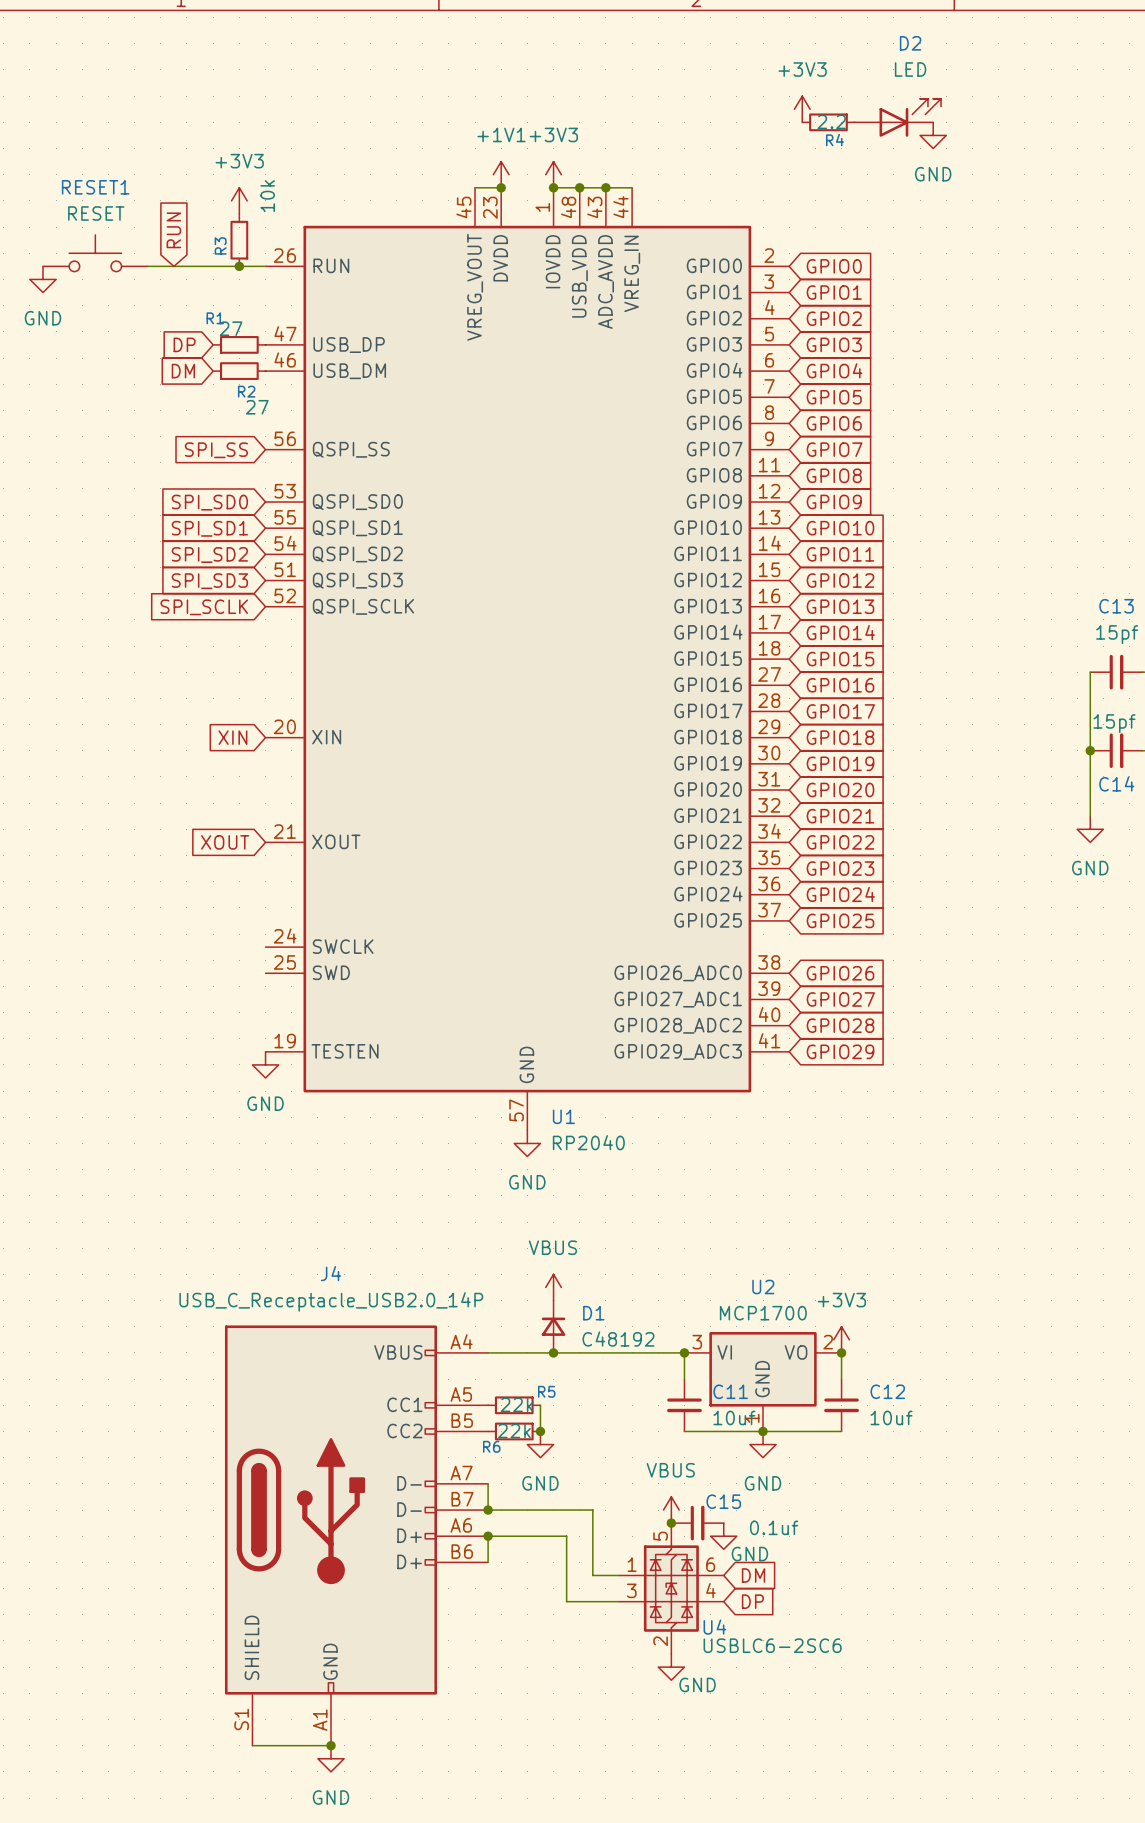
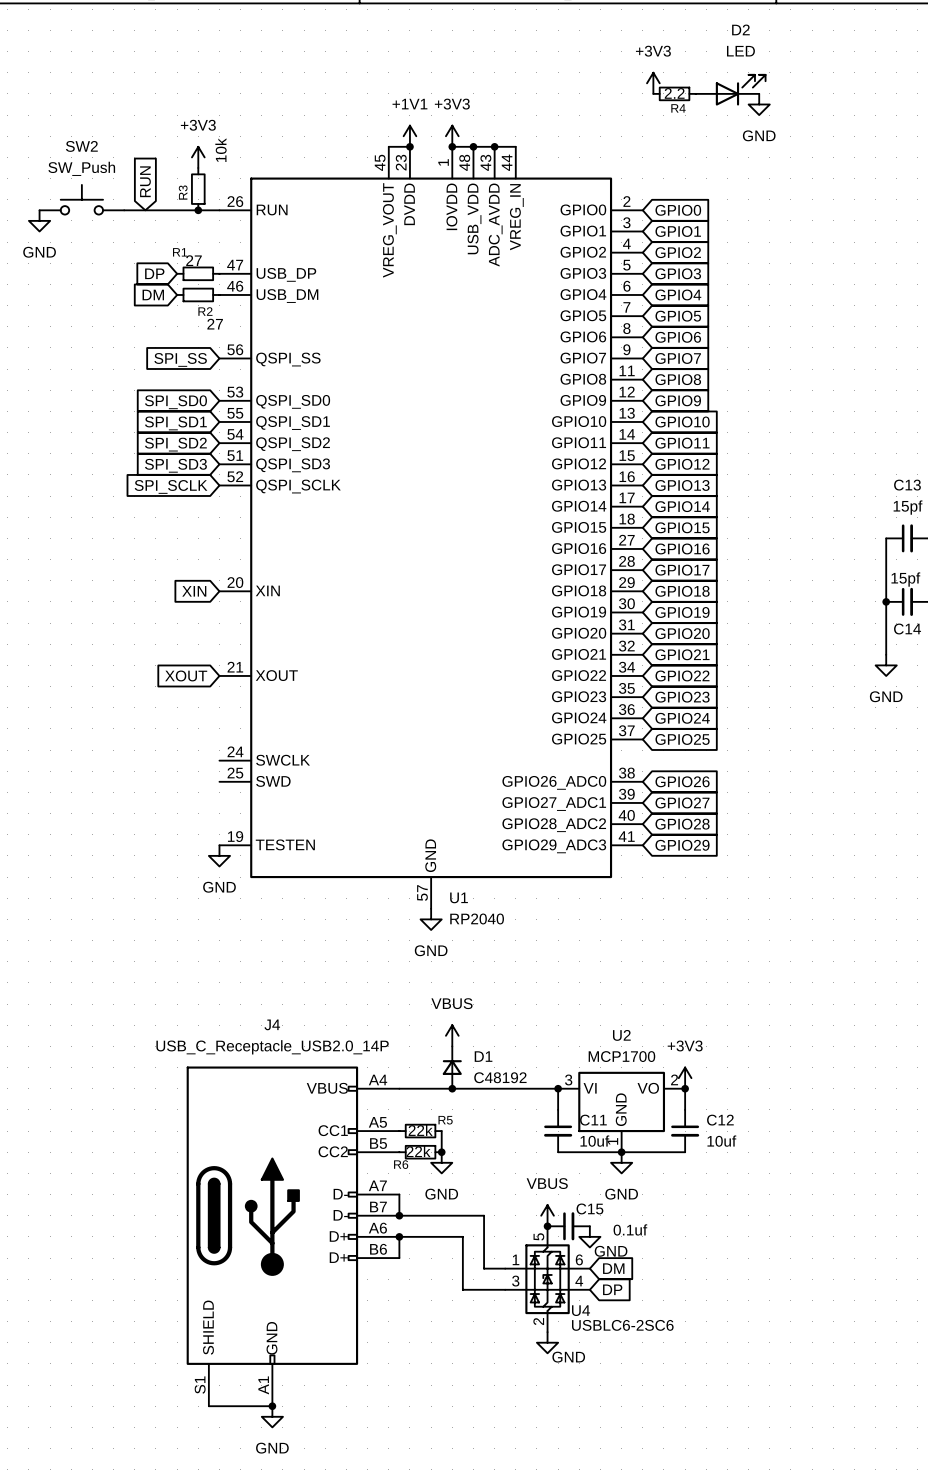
RESET1 name: RESET1 (95, 187) -> SW2 (81, 146)
RESET1 value: RESET (96, 213) -> SW_Push (81, 168)

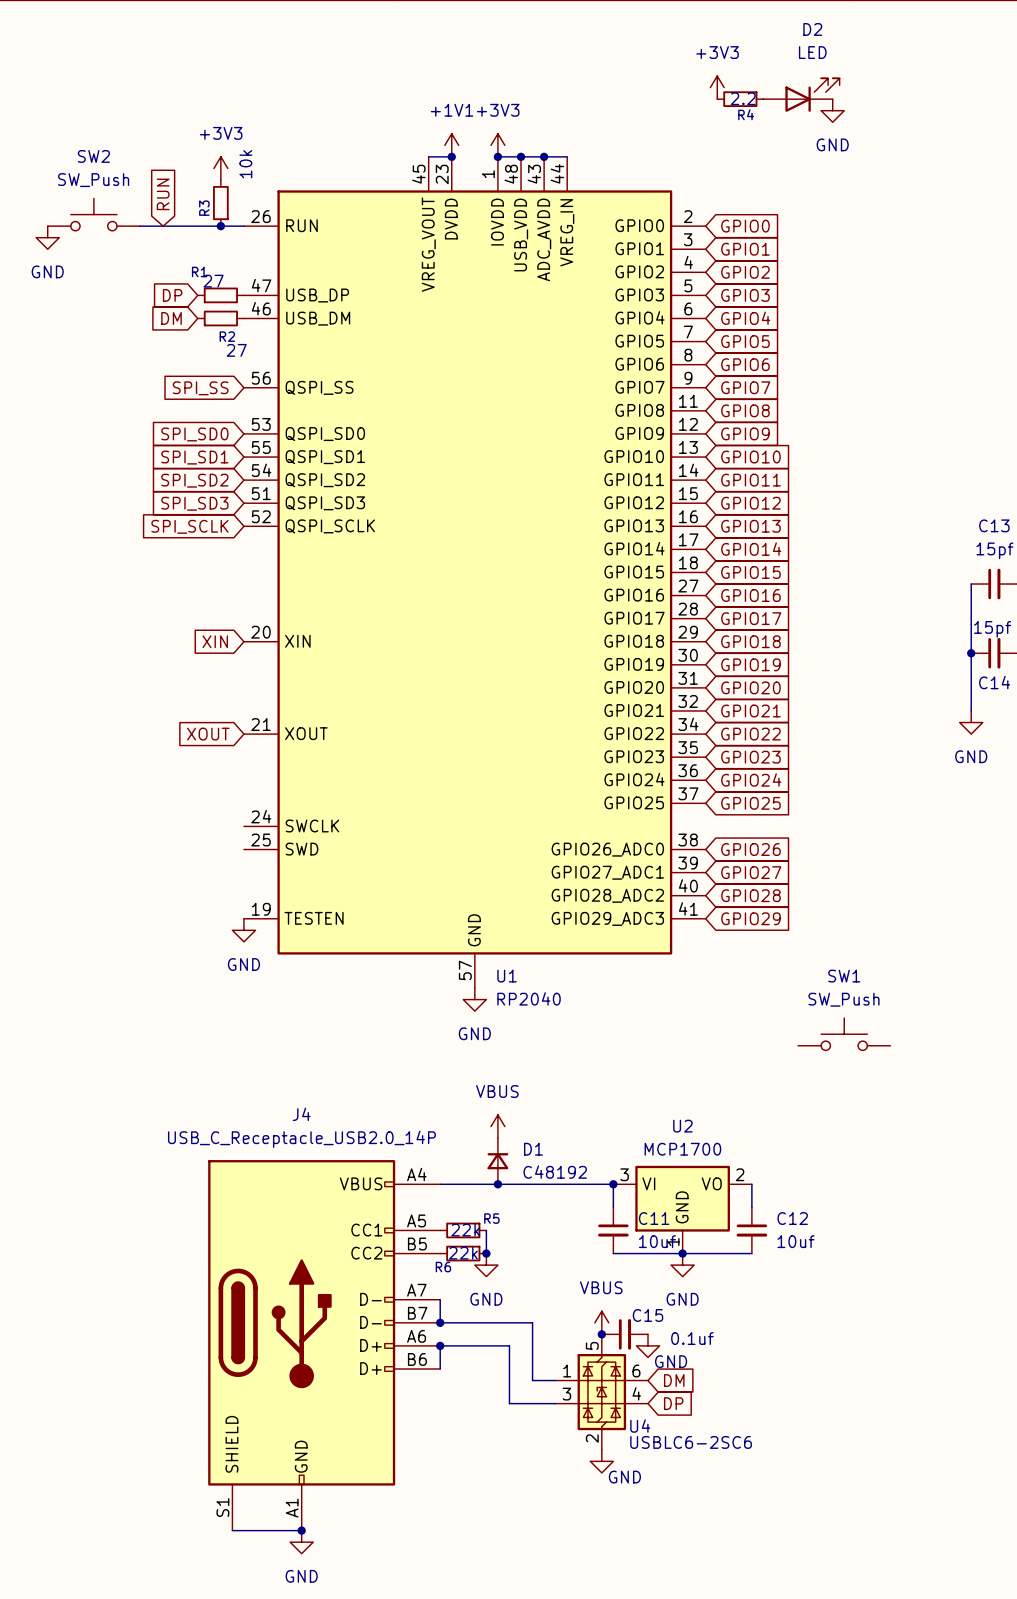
SW1: none -> SW_Push (844, 1034)
power symbol: +3V3 (685, 1078) -> none
junction: (685, 1088) -> none

